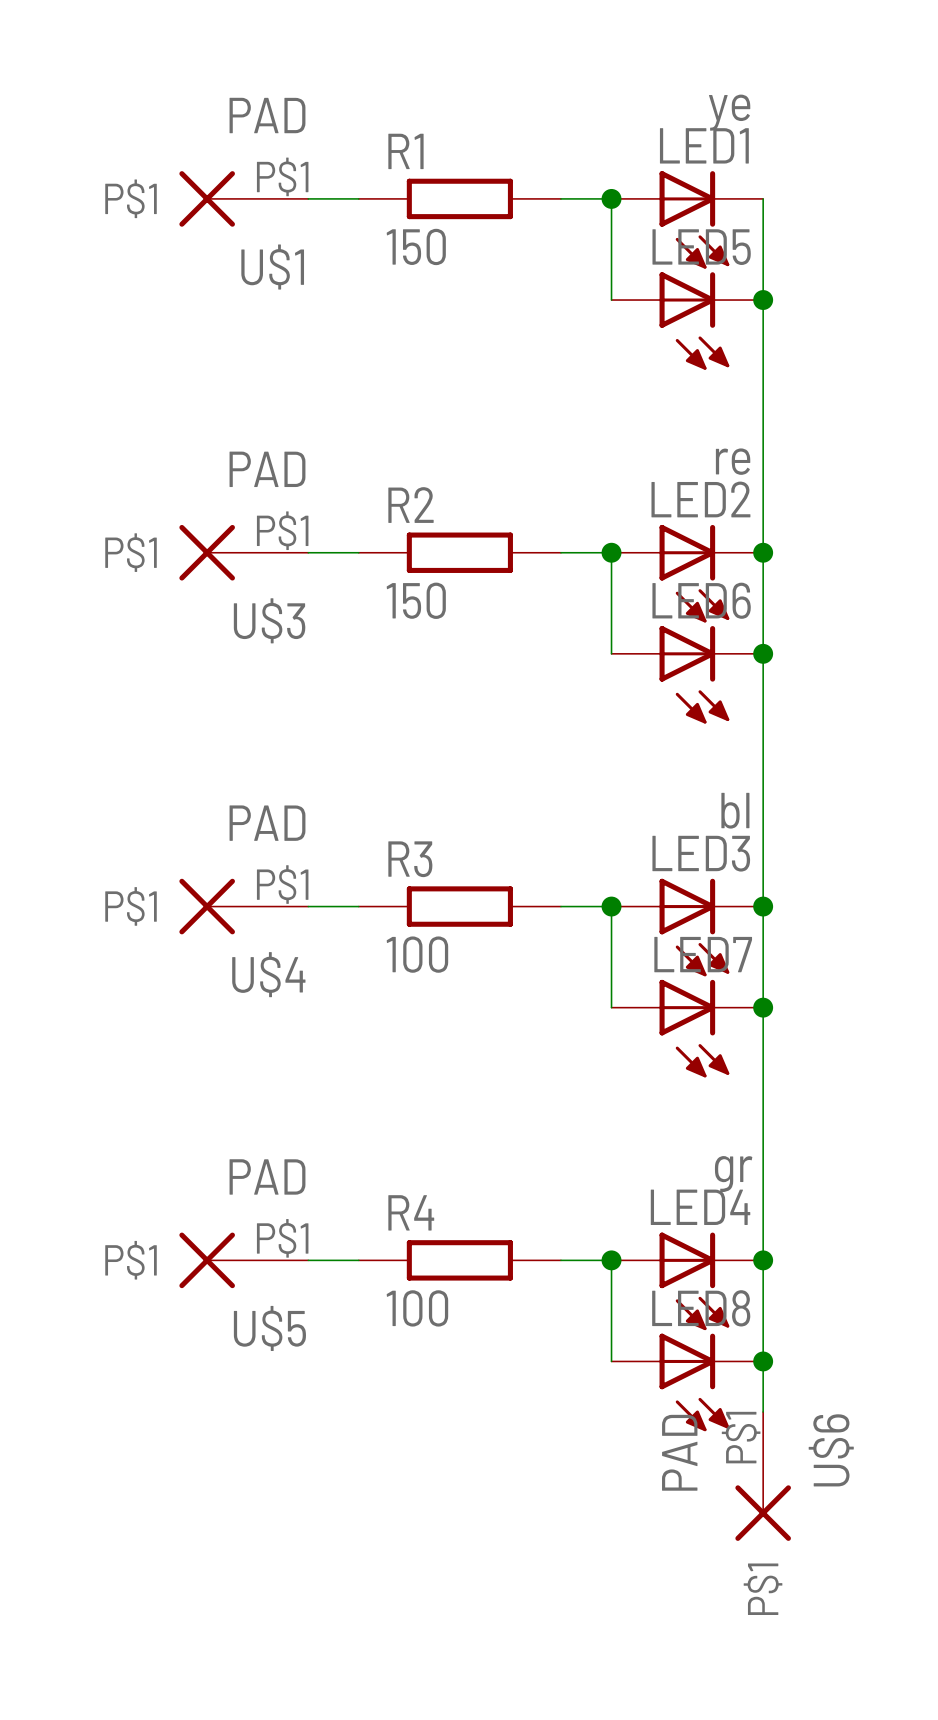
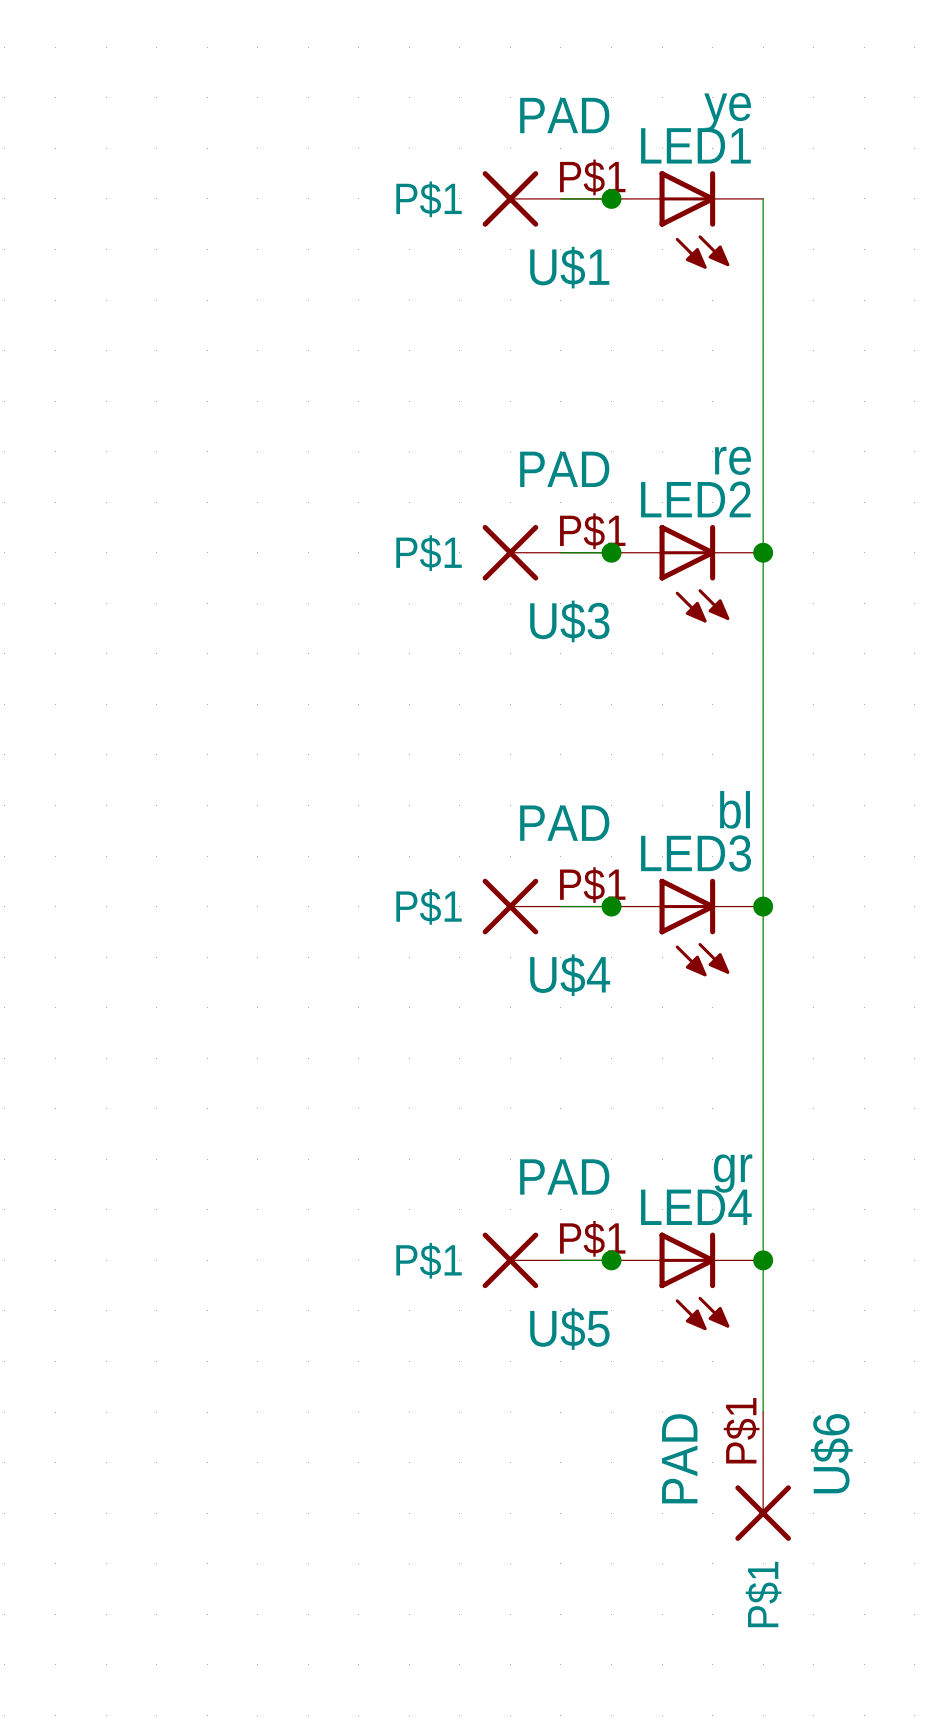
U$1 position: (243, 198) -> (547, 198)
wire: (308, 198) (358, 198) -> none
R1: 150 (459, 198) -> none
wire: (611, 198) (611, 300) -> none
junction: (763, 300) -> none
LED5: (687, 321) -> none
U$3 position: (243, 552) -> (547, 552)
wire: (308, 552) (358, 552) -> none
R2: 150 (459, 552) -> none
wire: (611, 552) (611, 653) -> none
junction: (763, 653) -> none
LED6: (687, 674) -> none
U$4 position: (243, 906) -> (547, 906)
wire: (308, 906) (358, 906) -> none
R3: 100 (459, 906) -> none
wire: (611, 906) (611, 1007) -> none
junction: (763, 1007) -> none
LED7: (687, 1028) -> none
U$5 position: (243, 1260) -> (547, 1260)
wire: (308, 1260) (358, 1260) -> none
R4: 100 (459, 1260) -> none
wire: (611, 1260) (611, 1361) -> none
junction: (763, 1361) -> none
LED8: (687, 1382) -> none

